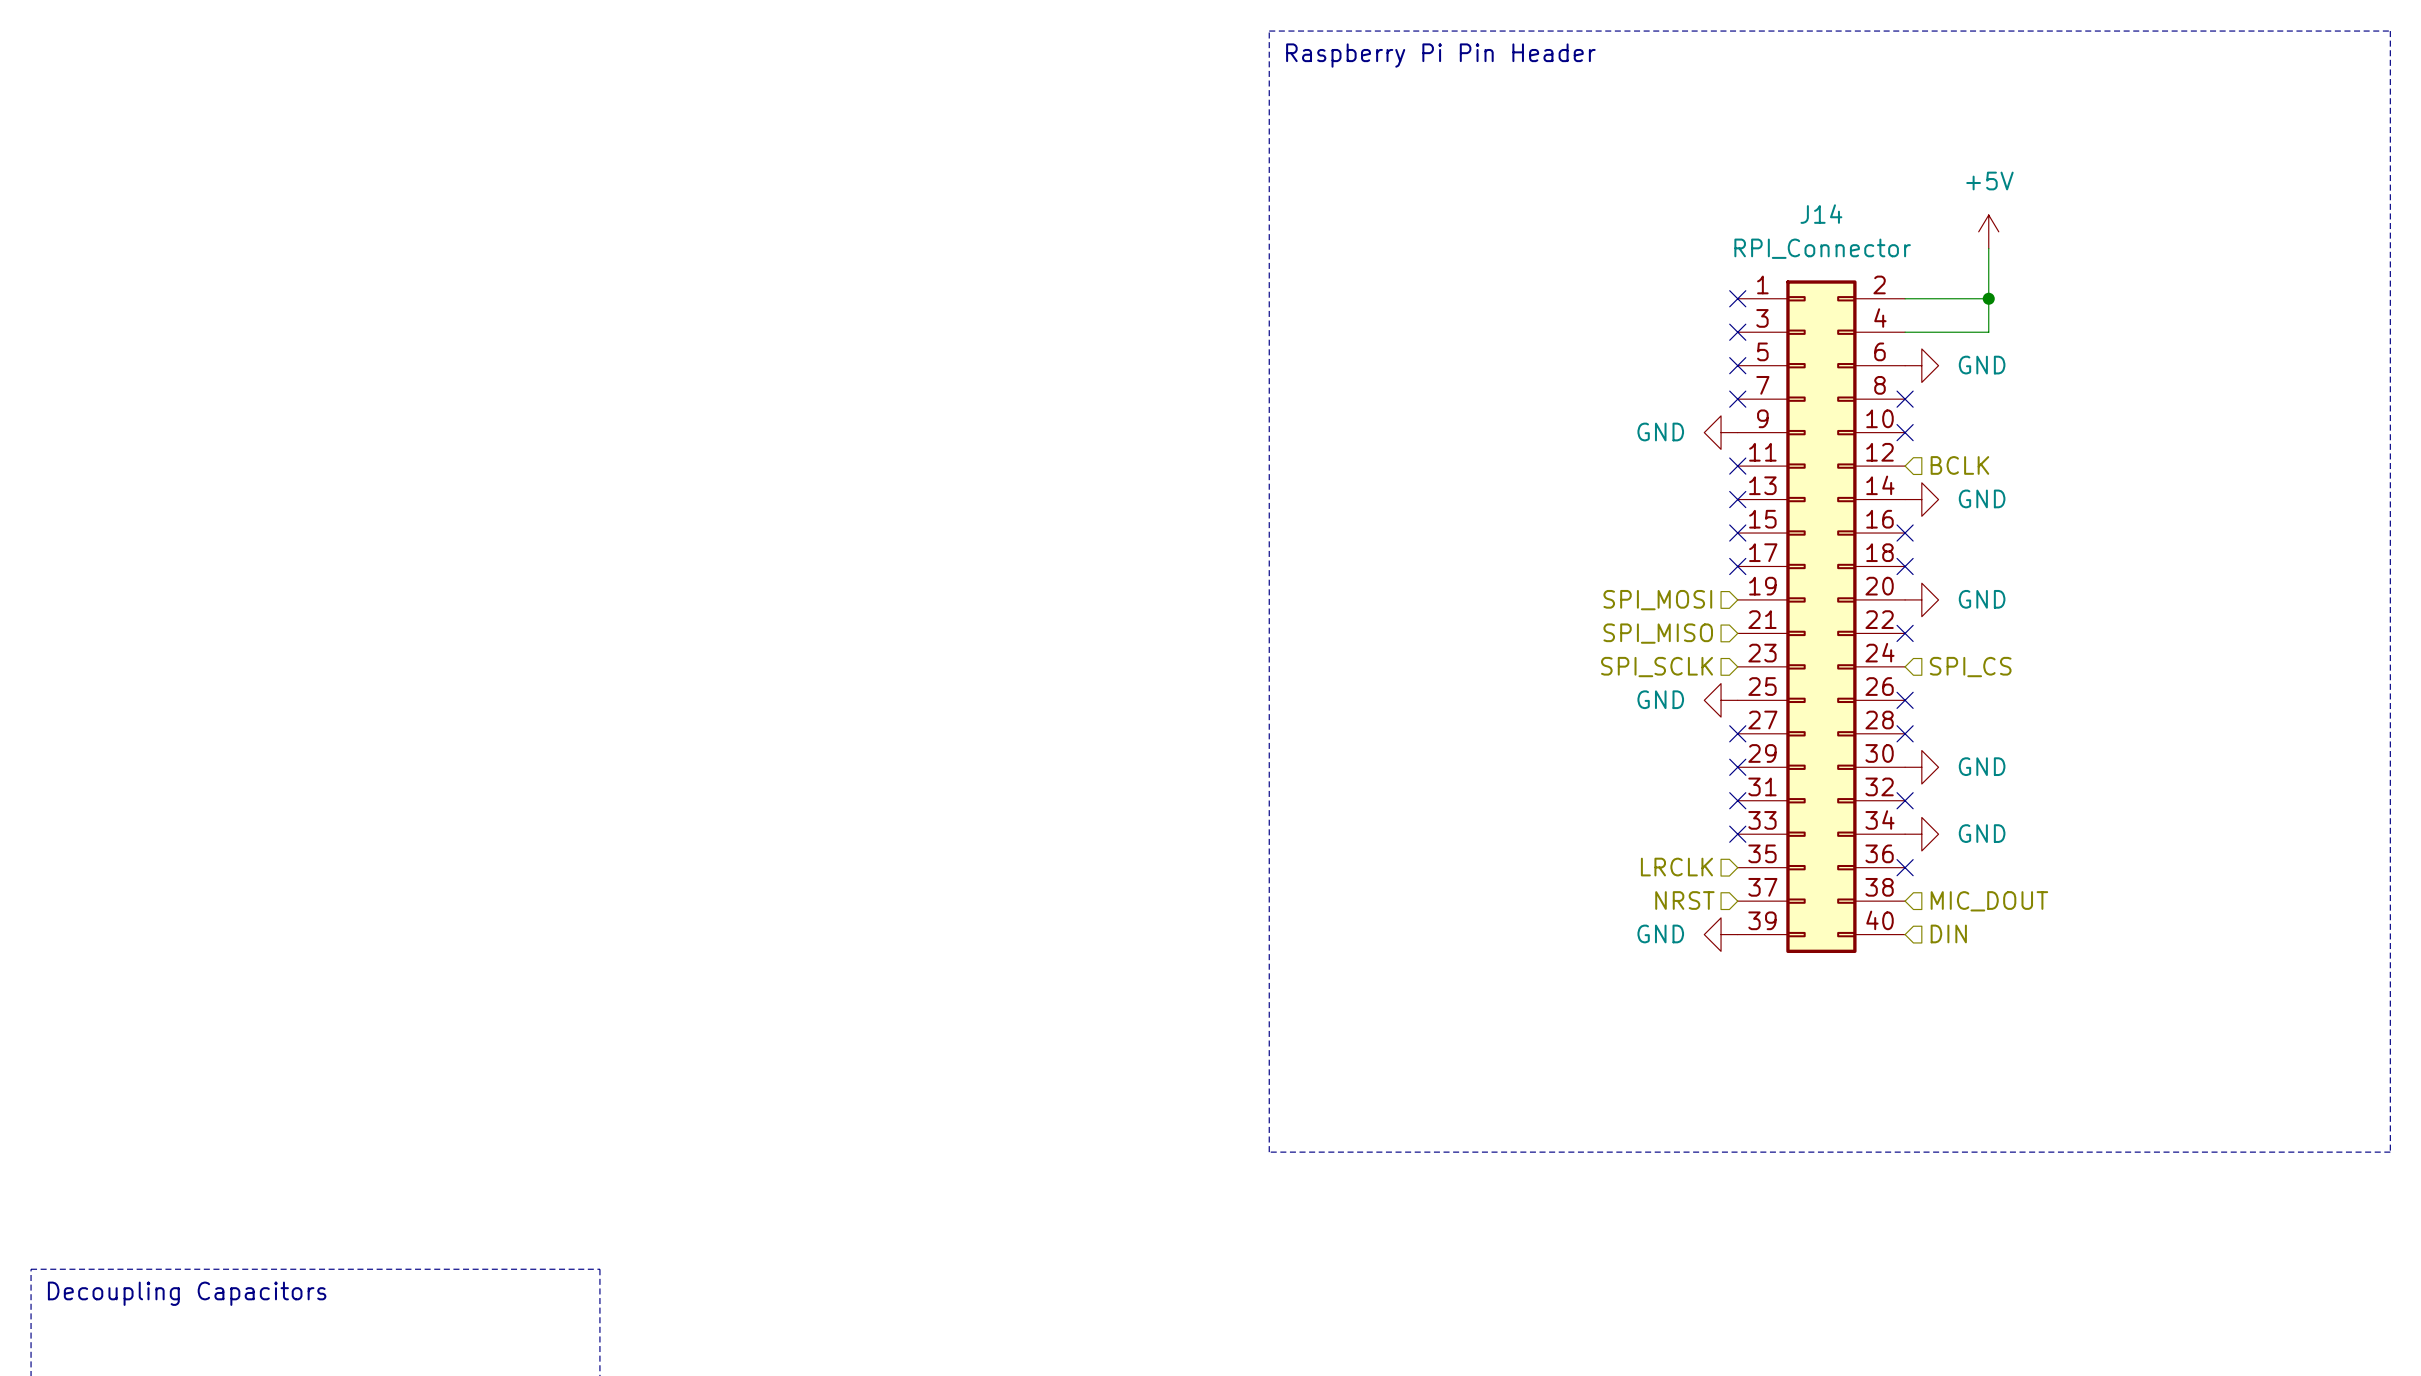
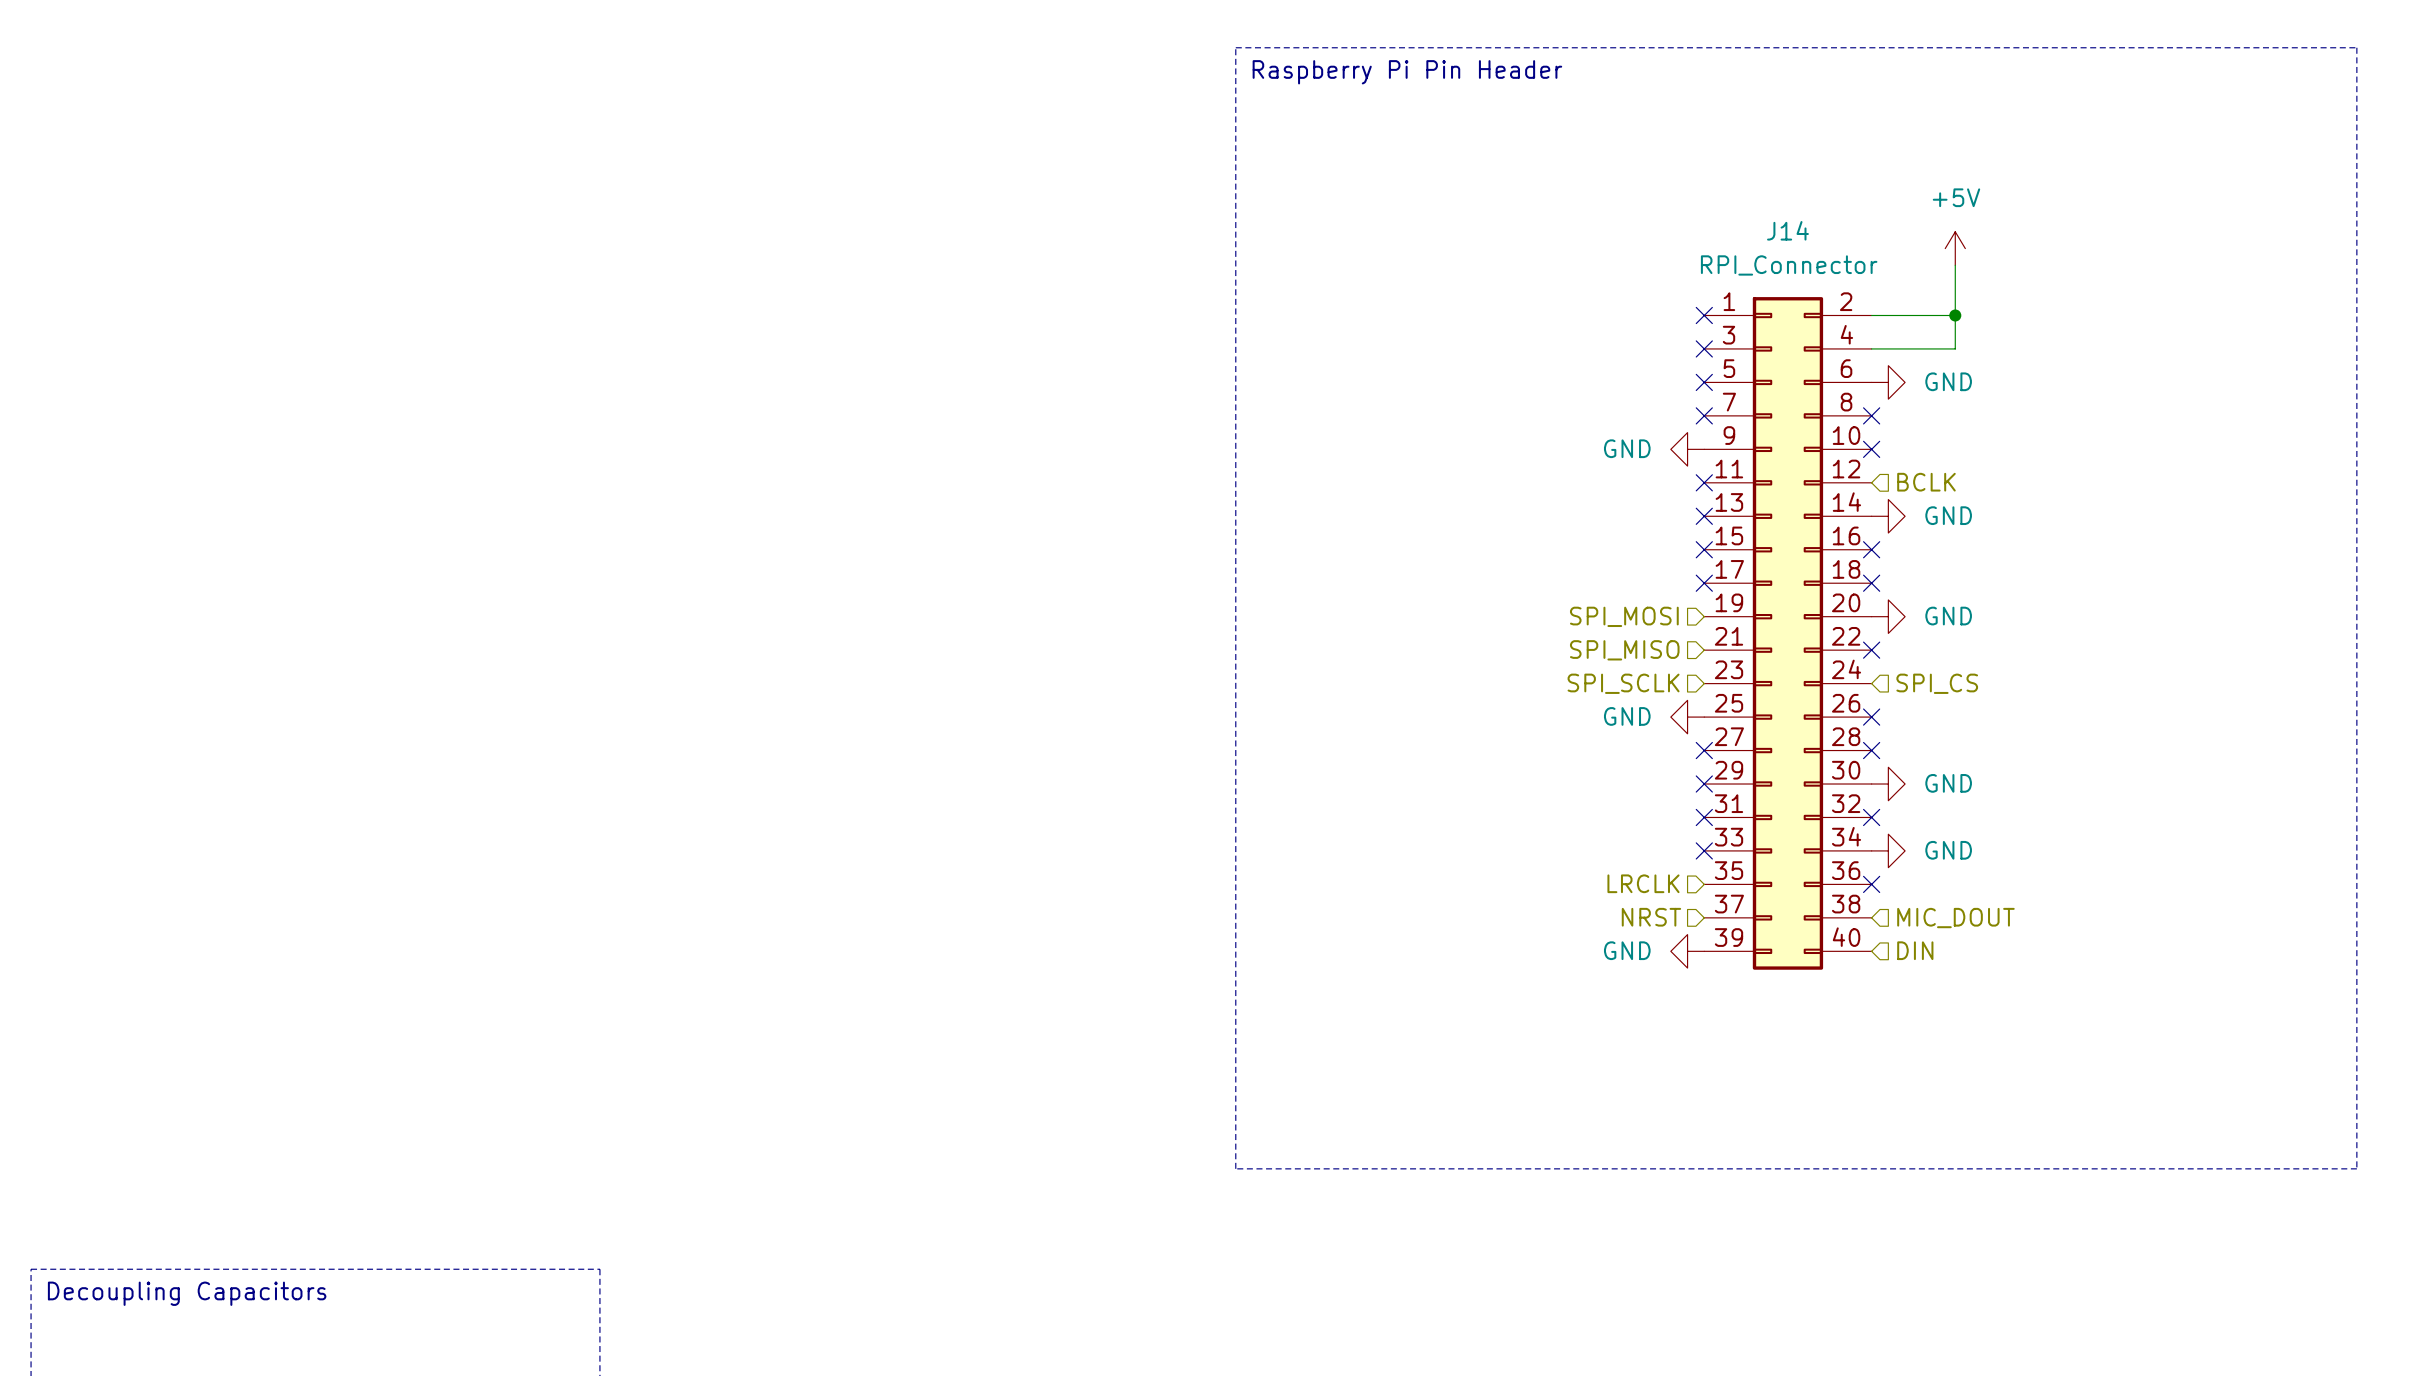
line: (1269, 31) (2390, 31) (2390, 1152) (1269, 1152) (1269, 31) -> (1235, 47) (2356, 47) (2356, 1168) (1235, 1168) (1235, 47)
text position: Raspberry Pi Pin Header (1440, 55) -> Raspberry Pi Pin Header (1407, 72)
power symbol position: +5V (1988, 231) -> +5V (1955, 248)
wire: (1988, 248) (1988, 332) (1905, 332) -> (1955, 265) (1955, 348) (1871, 348)
no-connect mark: (1737, 298) -> none
wire: (1905, 298) (1988, 298) -> (1871, 315) (1955, 315)
junction position: (1988, 298) -> (1955, 315)
no-connect mark: none -> (1704, 315)
no-connect mark: (1737, 332) -> none
no-connect mark: none -> (1704, 348)
no-connect mark: (1737, 365) -> none
power symbol position: GND (1921, 365) -> GND (1888, 382)
no-connect mark: none -> (1704, 382)
no-connect mark: (1737, 399) -> none
no-connect mark: (1905, 399) -> none
no-connect mark: none -> (1704, 415)
no-connect mark: none -> (1871, 415)
power symbol position: GND (1721, 432) -> GND (1687, 449)
no-connect mark: (1905, 432) -> none
no-connect mark: none -> (1871, 449)
hierarchical label position: BCLK (1959, 465) -> BCLK (1926, 482)
no-connect mark: (1737, 466) -> none
no-connect mark: none -> (1704, 482)
no-connect mark: (1737, 499) -> none
power symbol position: GND (1921, 499) -> GND (1888, 516)
no-connect mark: none -> (1704, 516)
no-connect mark: (1737, 533) -> none
no-connect mark: (1905, 533) -> none
no-connect mark: none -> (1704, 549)
no-connect mark: none -> (1871, 549)
no-connect mark: (1737, 566) -> none
no-connect mark: (1905, 566) -> none
no-connect mark: none -> (1704, 583)
no-connect mark: none -> (1871, 583)
power symbol position: GND (1921, 599) -> GND (1888, 616)
hierarchical label position: SPI_MOSI (1657, 600) -> SPI_MOSI (1624, 616)
J14 position: (1821, 616) -> (1787, 633)
hierarchical label position: SPI_MISO (1658, 633) -> SPI_MISO (1624, 650)
no-connect mark: (1905, 633) -> none
no-connect mark: none -> (1871, 650)
hierarchical label position: SPI_SCLK (1657, 667) -> SPI_SCLK (1623, 683)
hierarchical label position: SPI_CS (1970, 667) -> SPI_CS (1937, 683)
power symbol position: GND (1721, 700) -> GND (1687, 717)
no-connect mark: (1905, 700) -> none
no-connect mark: none -> (1871, 717)
no-connect mark: (1737, 733) -> none
no-connect mark: (1905, 733) -> none
no-connect mark: none -> (1704, 750)
no-connect mark: none -> (1871, 750)
no-connect mark: (1737, 767) -> none
power symbol: GND (1921, 767) -> none
no-connect mark: none -> (1704, 784)
power symbol: none -> GND (1888, 784)
no-connect mark: (1737, 800) -> none
no-connect mark: (1905, 800) -> none
no-connect mark: none -> (1704, 817)
no-connect mark: none -> (1871, 817)
no-connect mark: (1737, 834) -> none
power symbol: GND (1921, 834) -> none
no-connect mark: none -> (1704, 850)
power symbol: none -> GND (1888, 850)
hierarchical label position: LRCLK (1676, 867) -> LRCLK (1643, 883)
no-connect mark: (1905, 867) -> none
no-connect mark: none -> (1871, 884)
hierarchical label position: NRST (1684, 900) -> NRST (1651, 917)
hierarchical label position: MIC_DOUT (1989, 901) -> MIC_DOUT (1955, 918)
hierarchical label position: DIN (1948, 933) -> DIN (1915, 950)
power symbol position: GND (1721, 934) -> GND (1687, 951)

